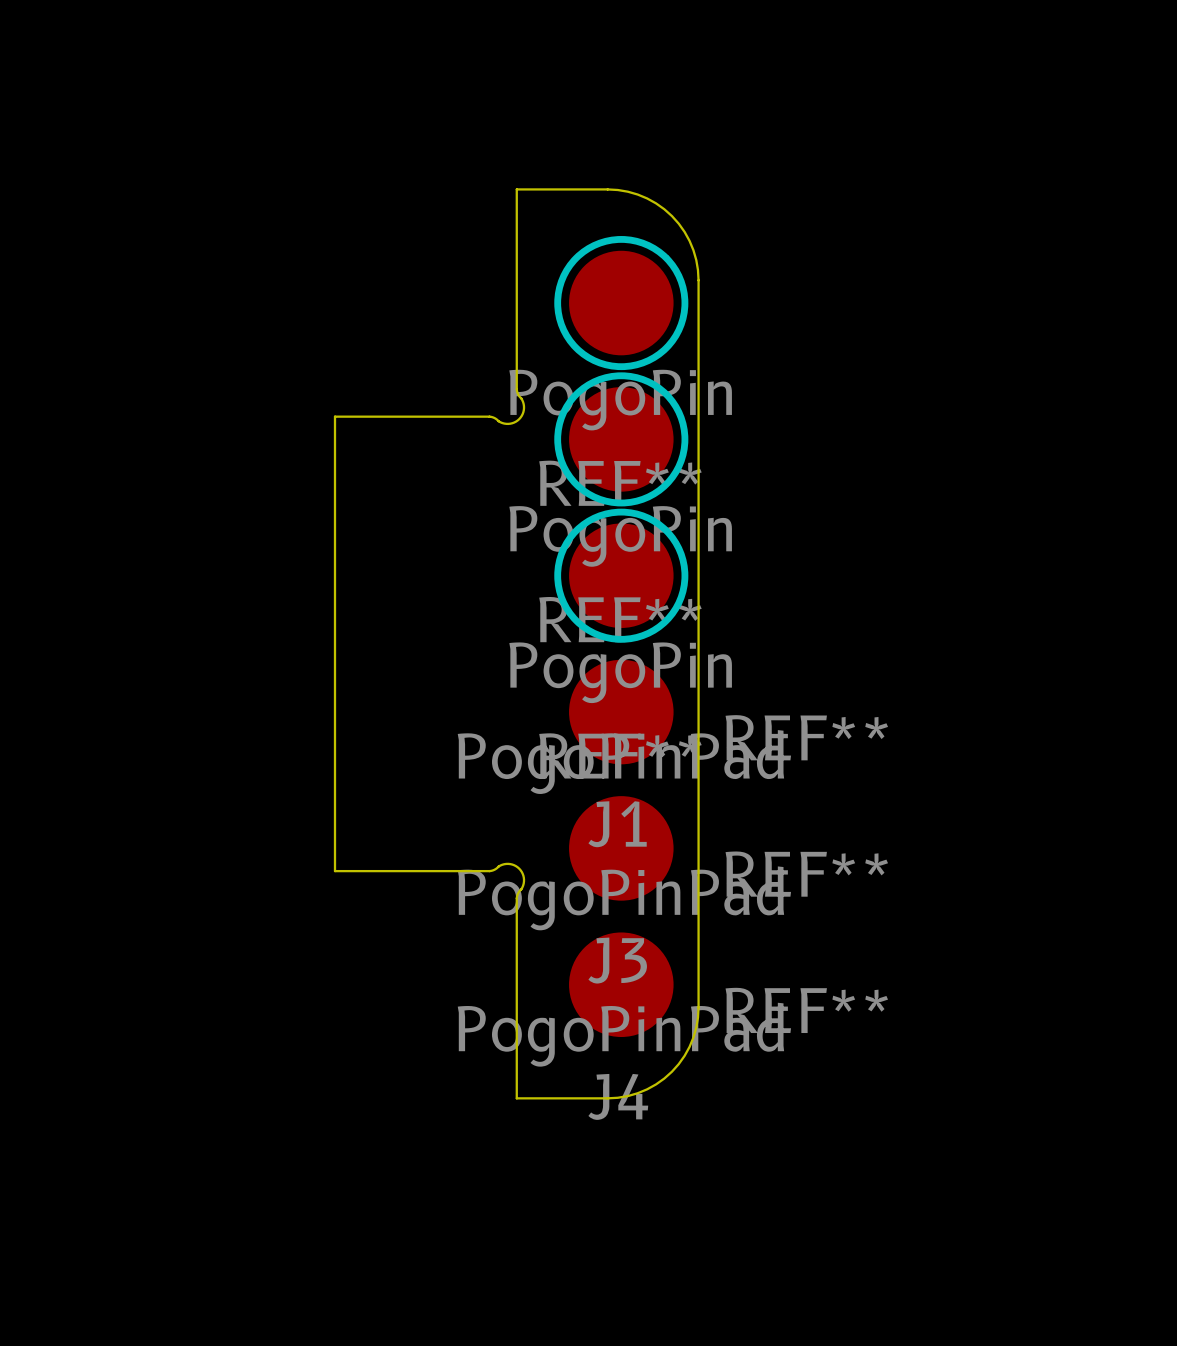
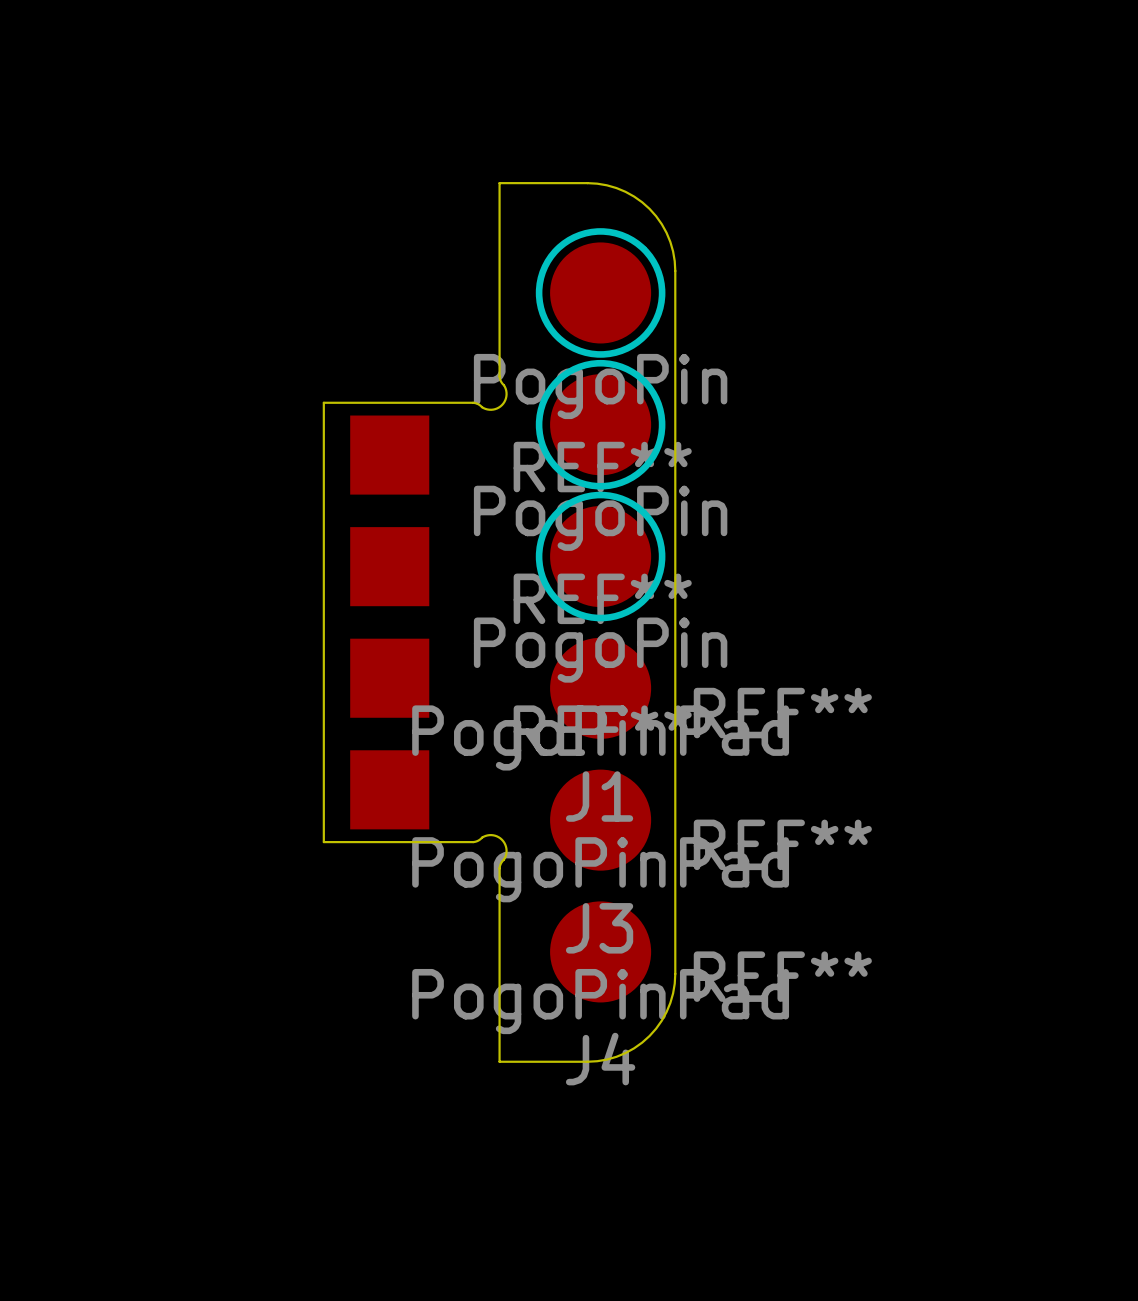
part: none -> (389, 622)

